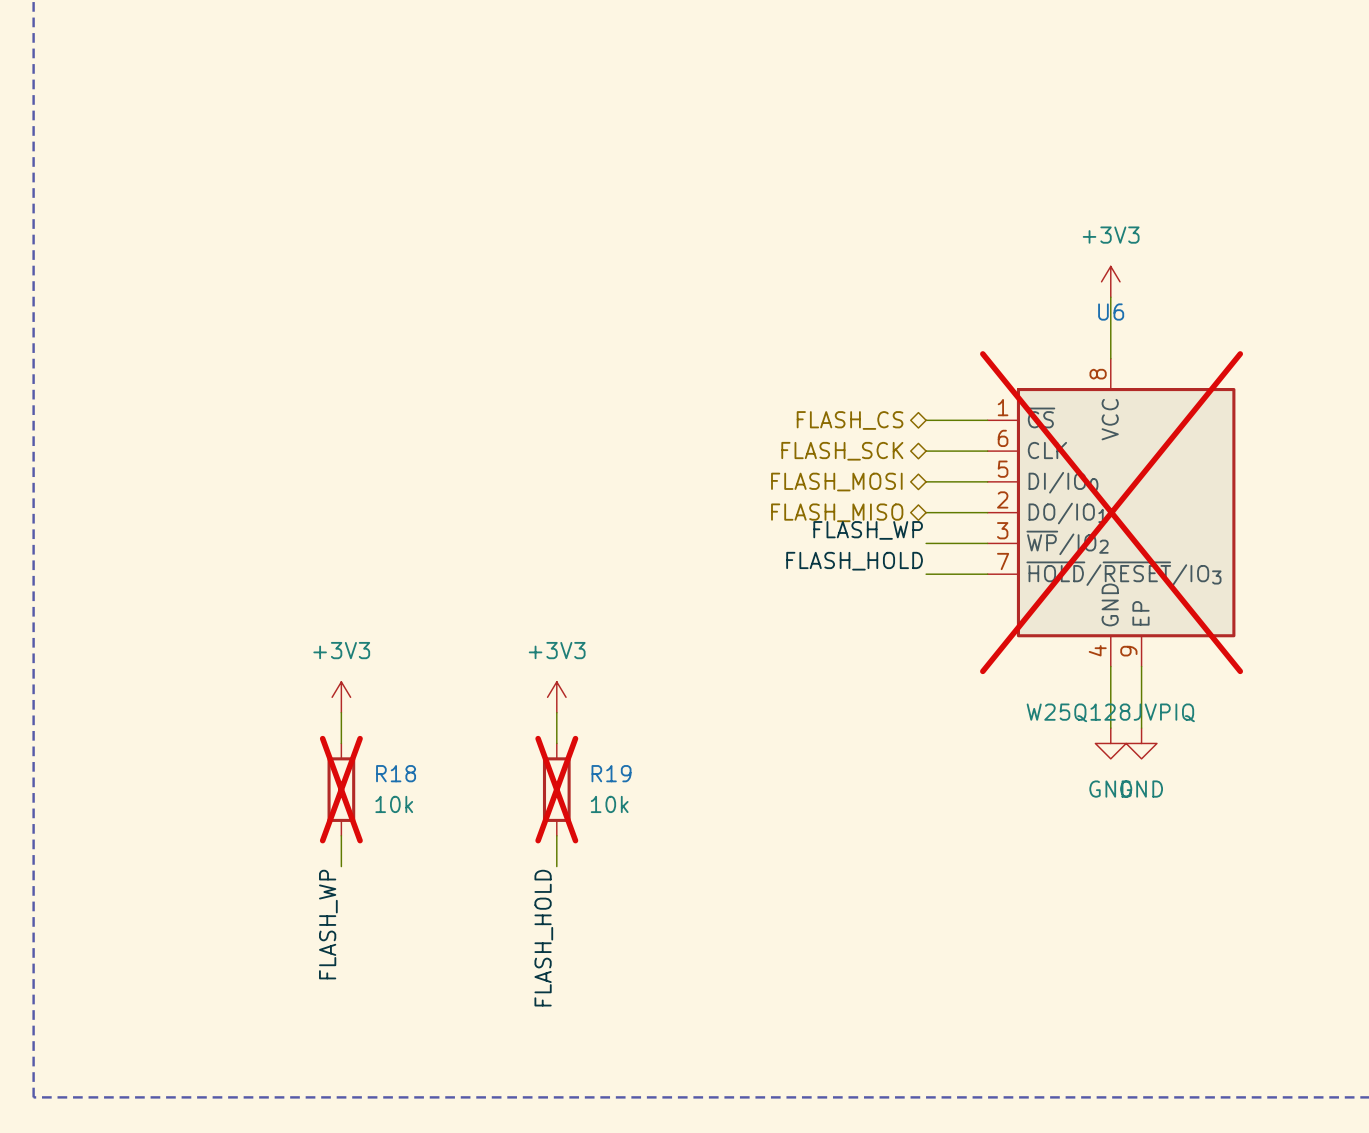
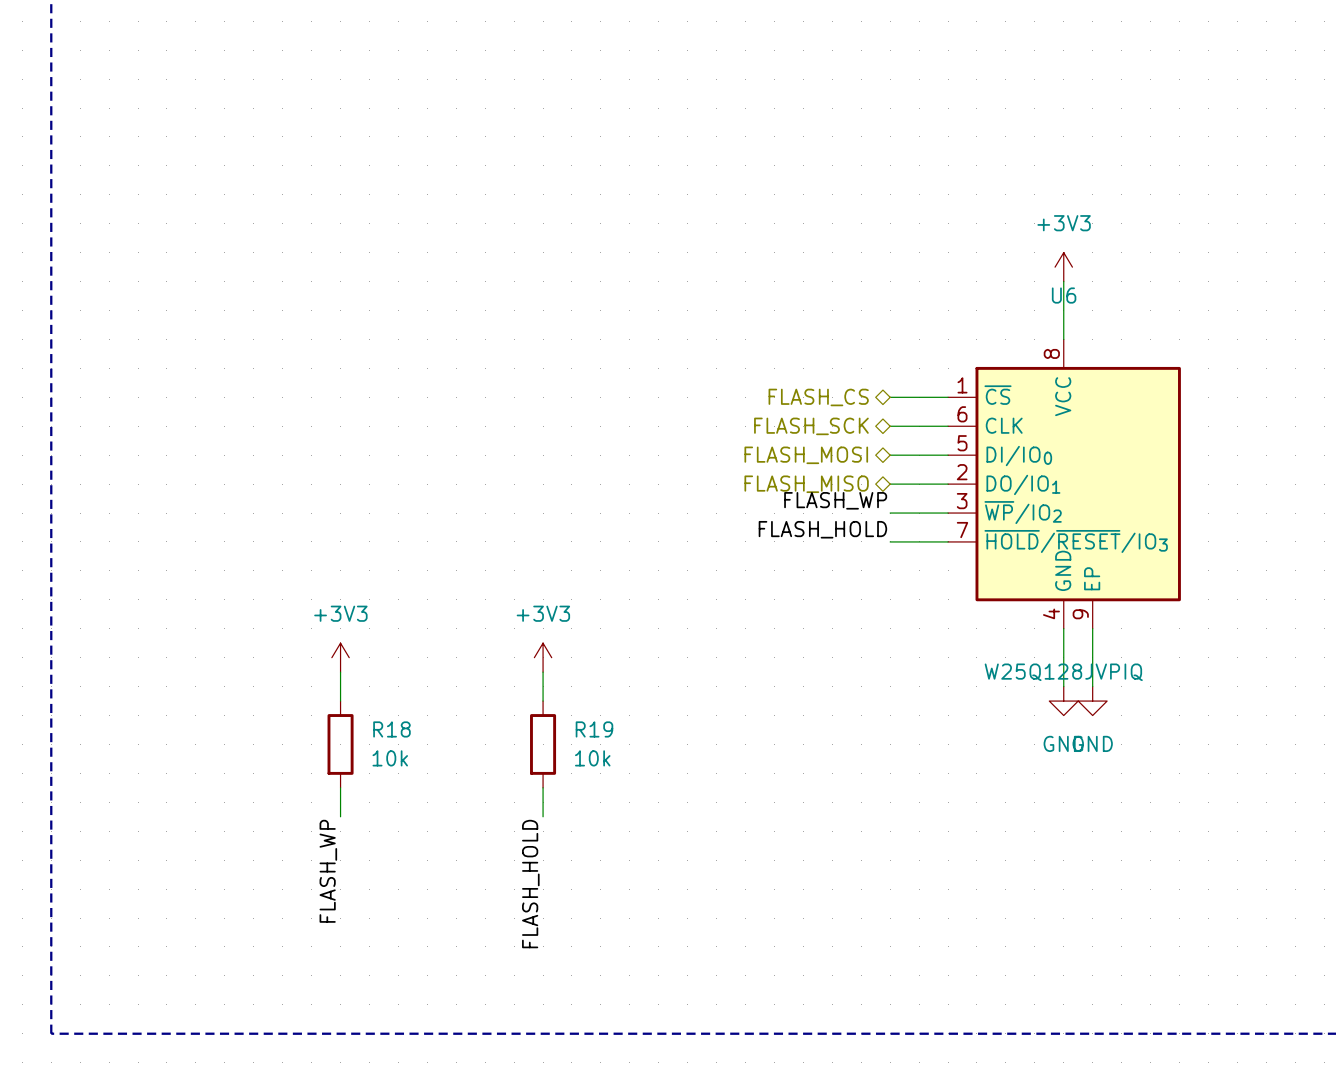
U6 do-not-place cross: (1111, 512) -> none
R18 do-not-place cross: (341, 789) -> none
R19 do-not-place cross: (556, 789) -> none

